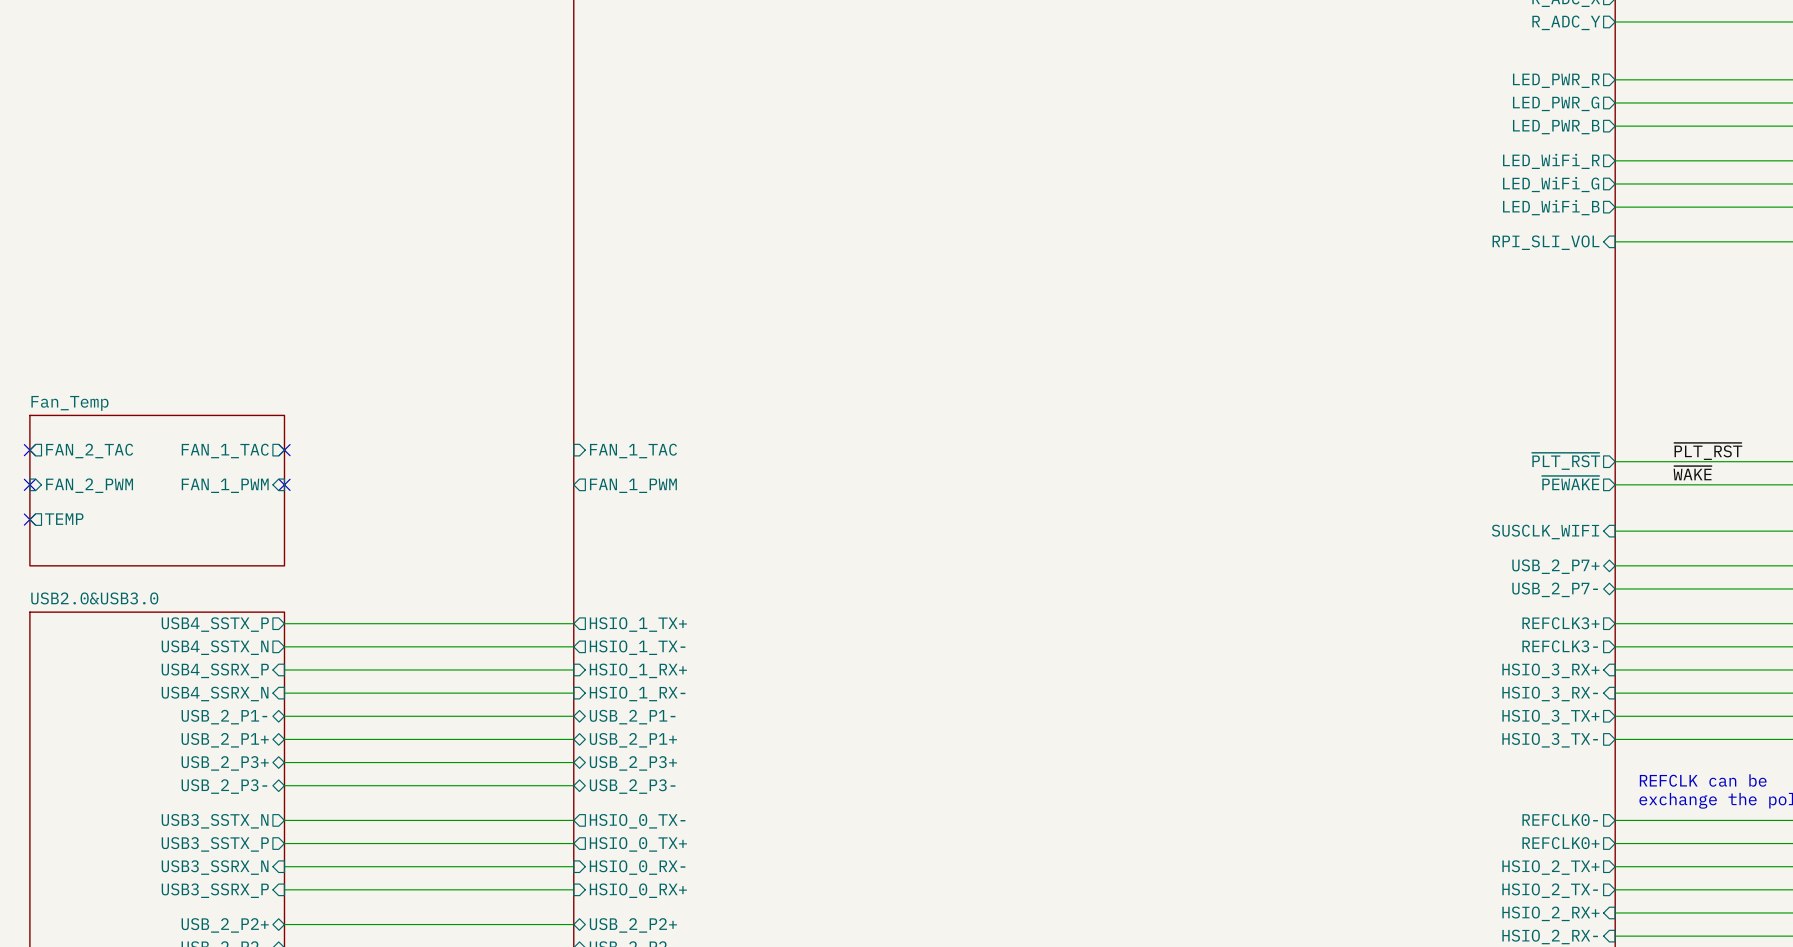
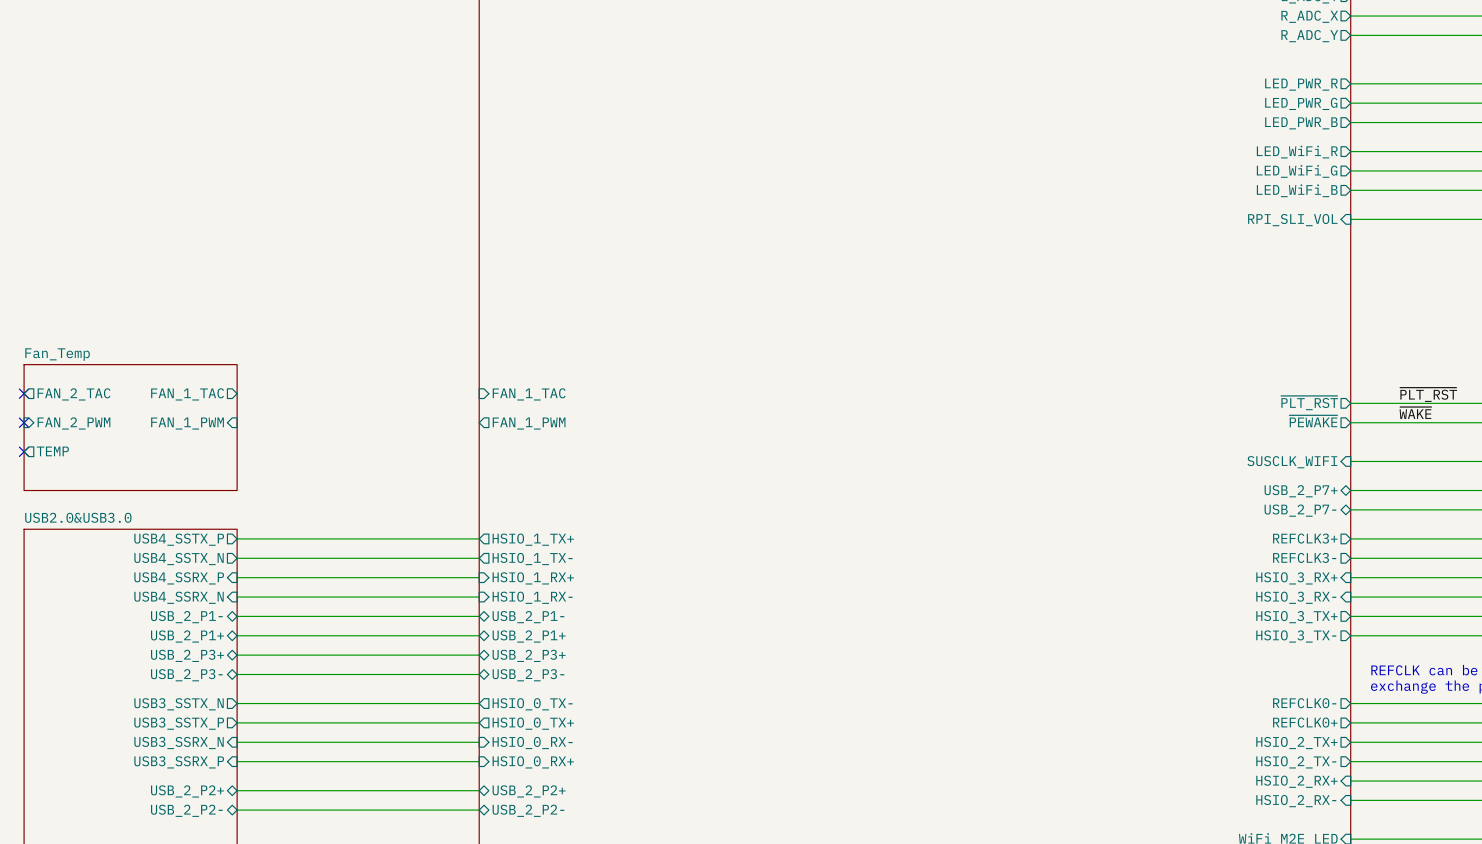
no-connect mark: (284, 450) -> none
no-connect mark: (284, 484) -> none

